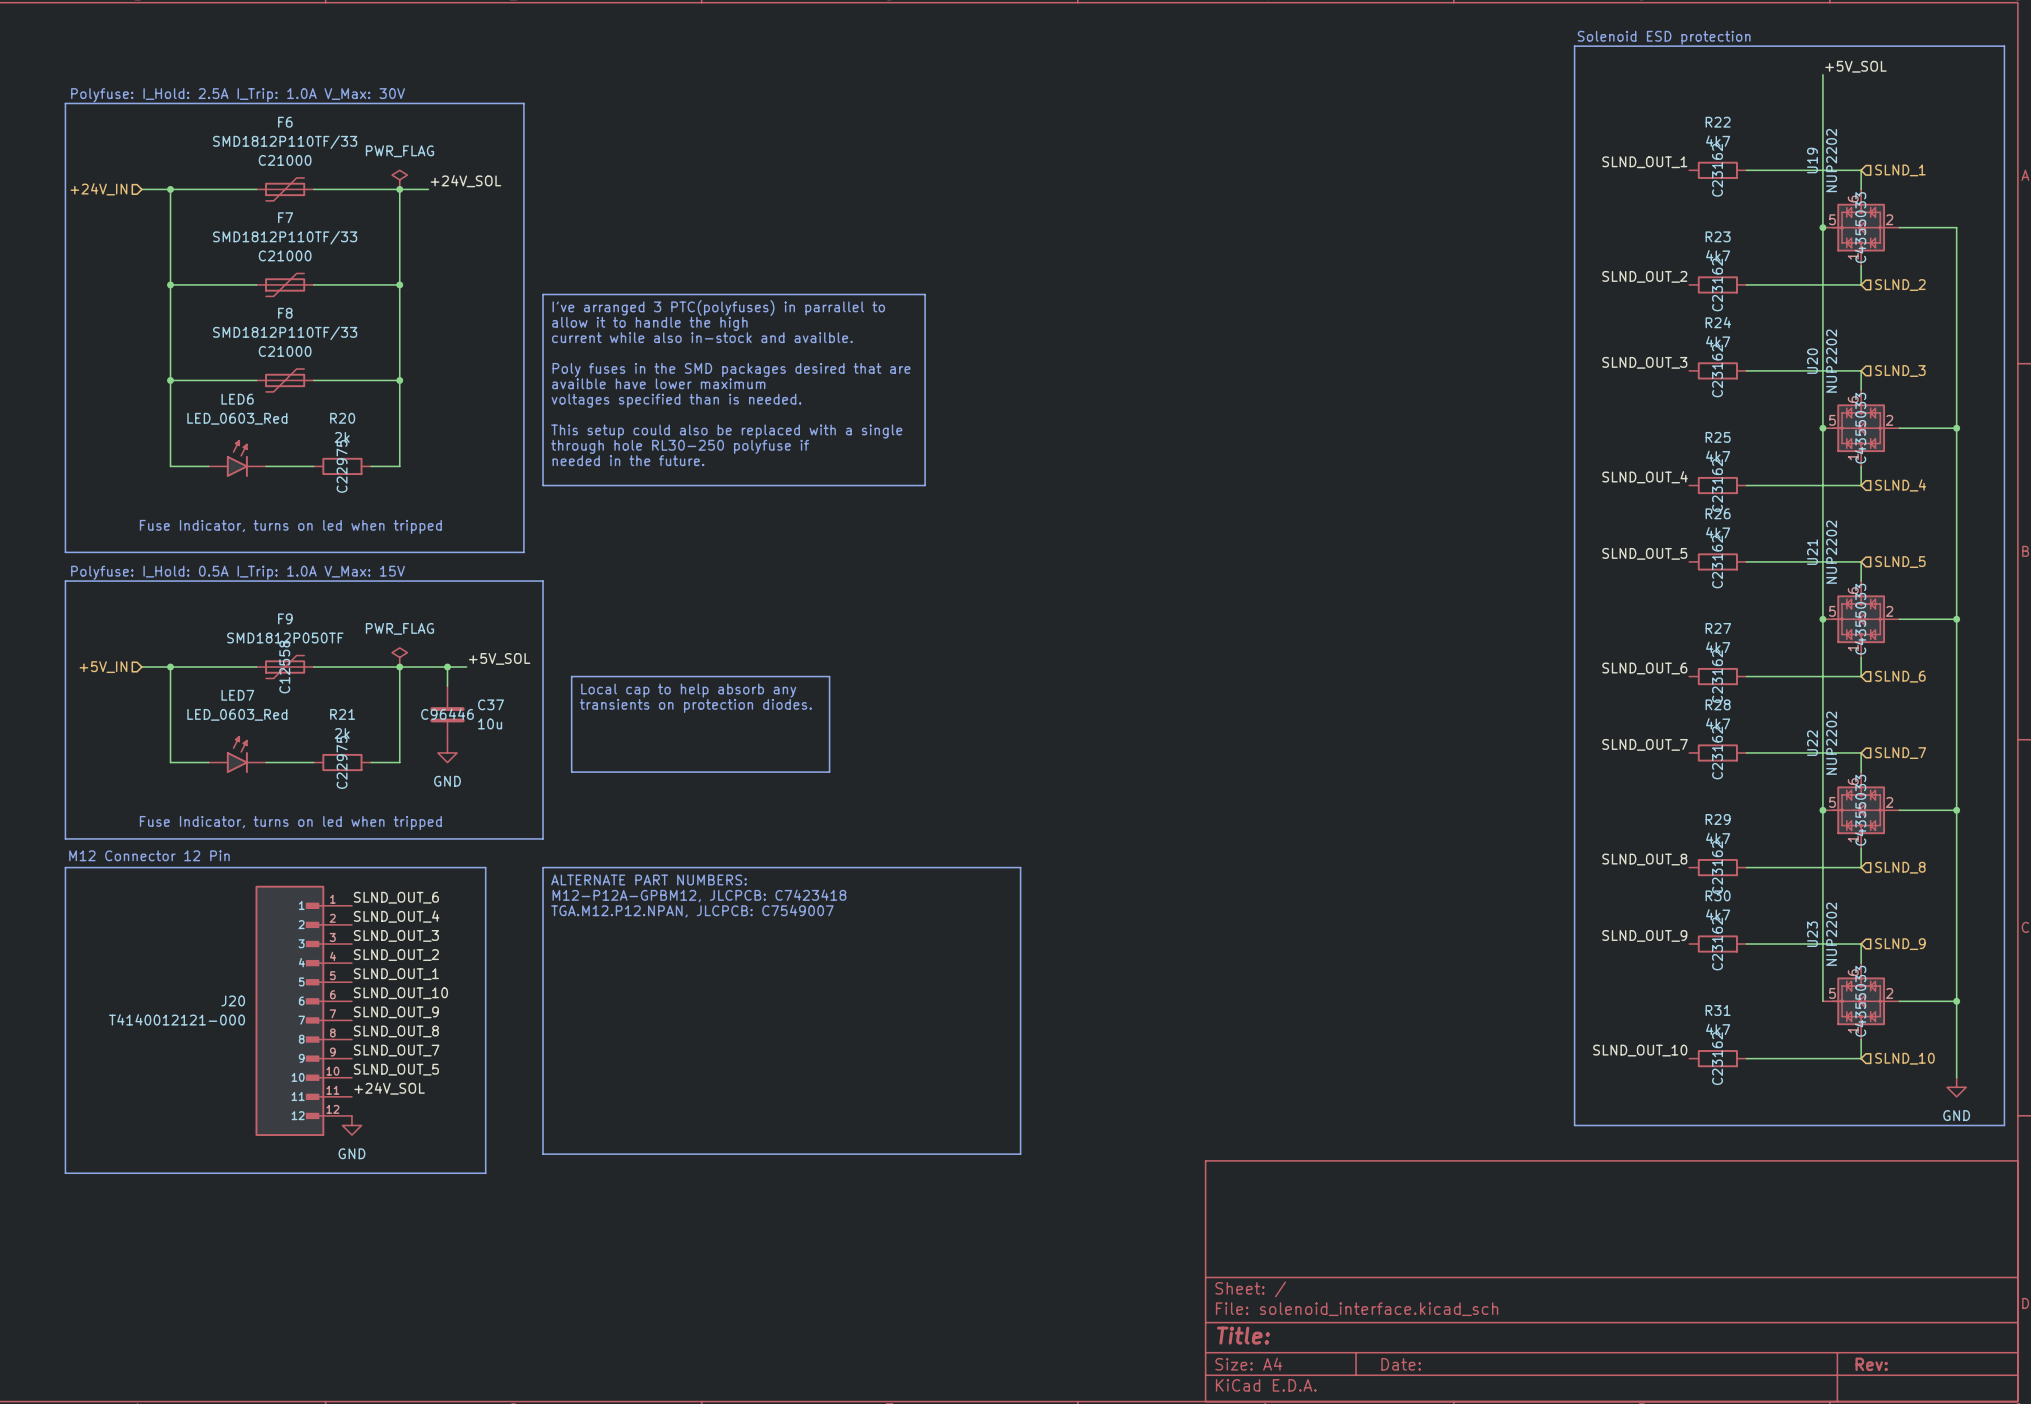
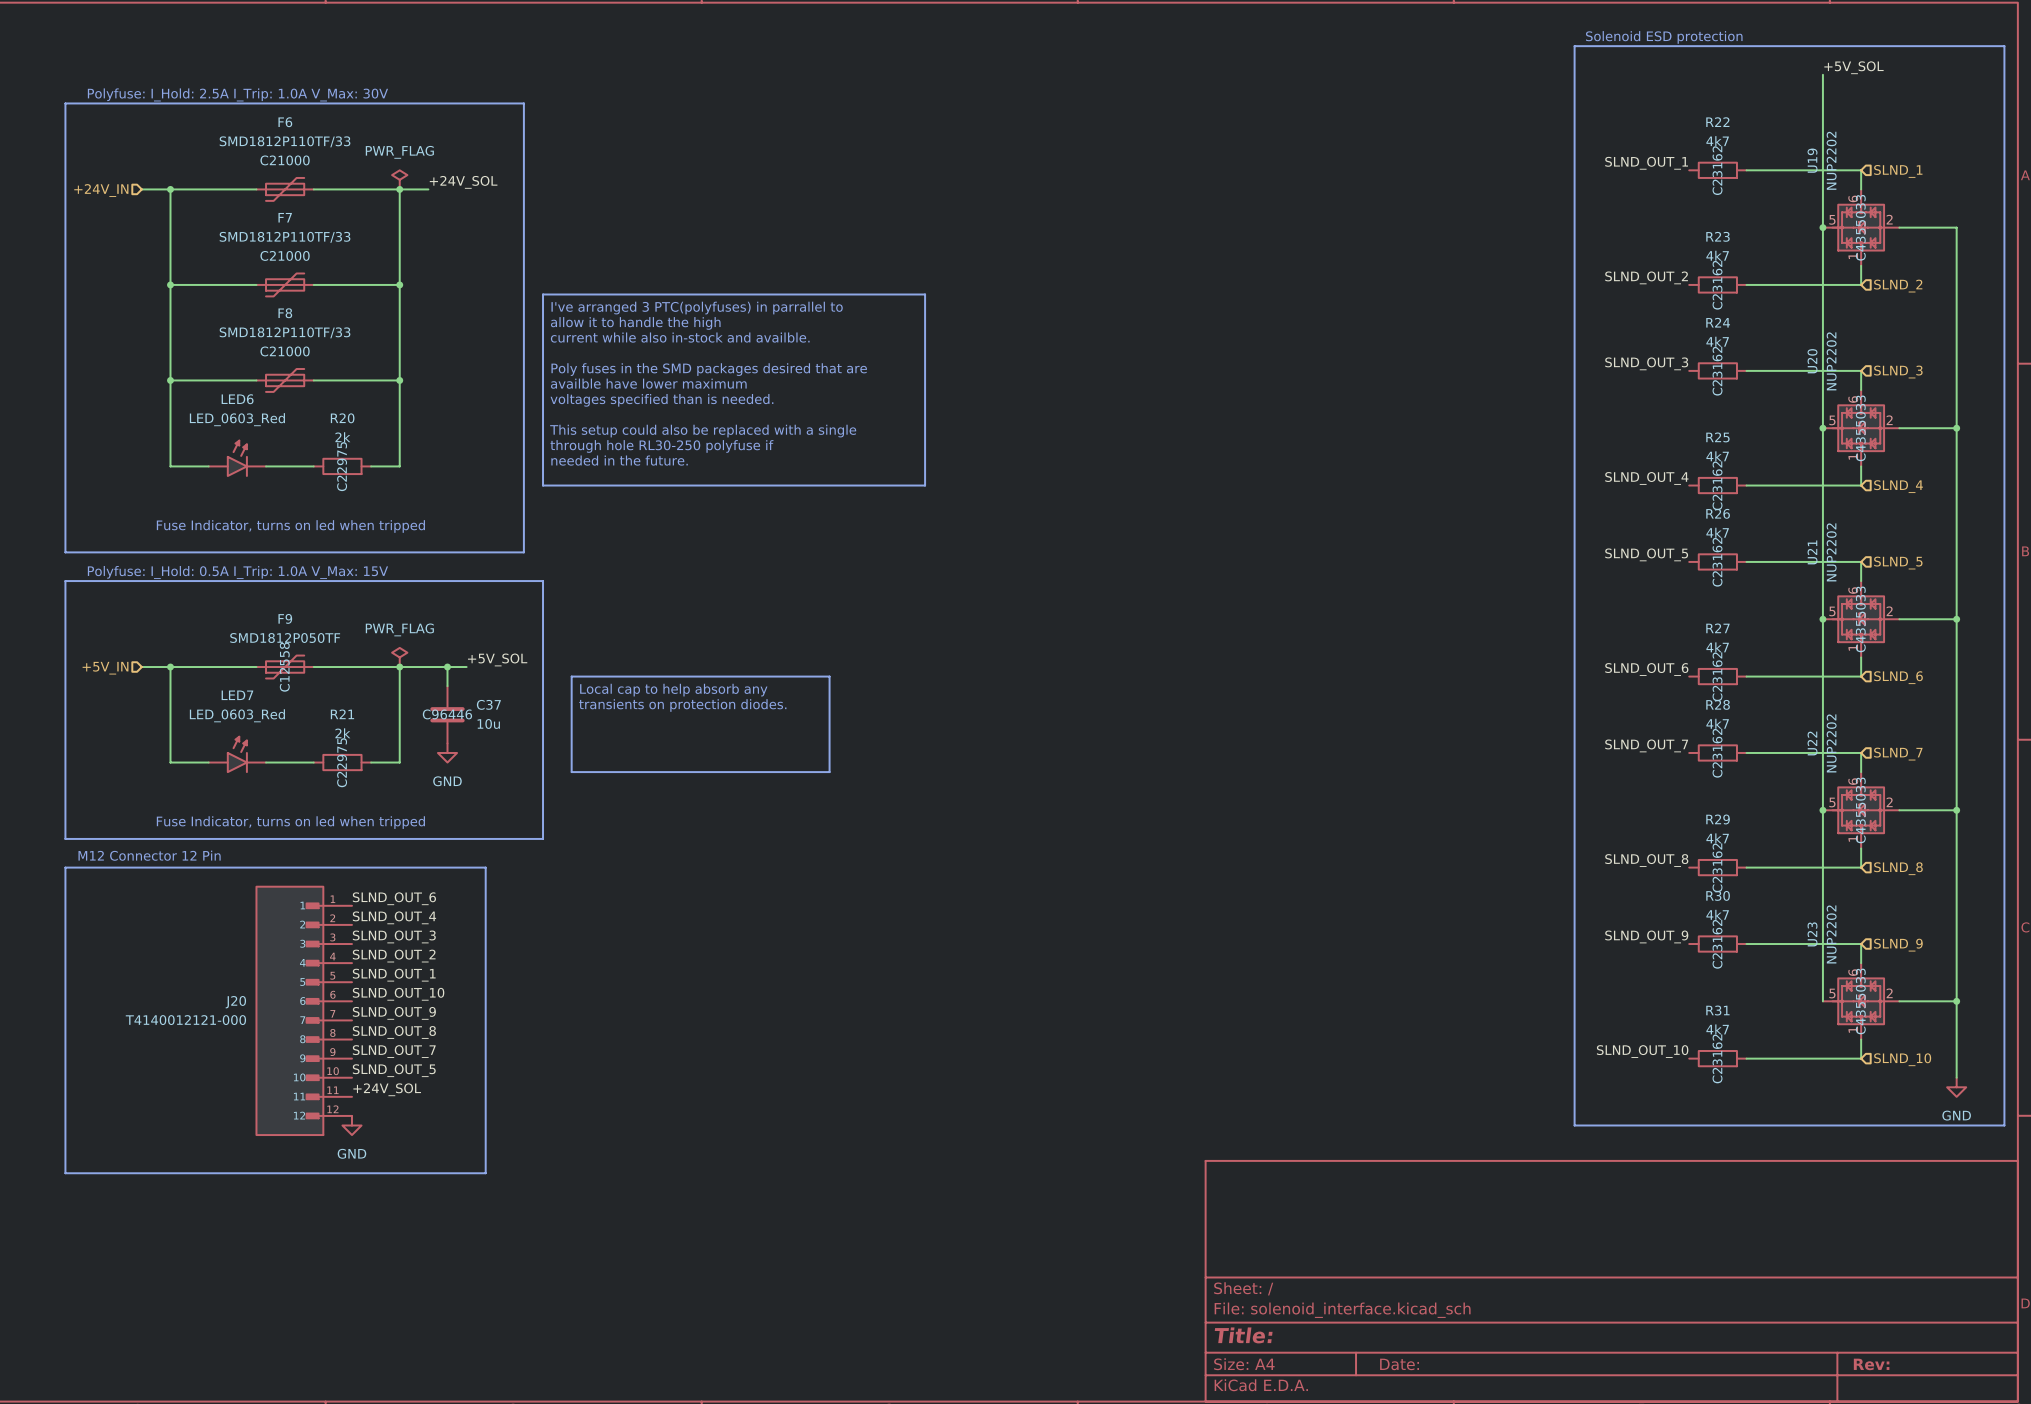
line: (543, 867) (1020, 867) (1020, 1154) (543, 1154) (543, 867) -> none
text: ALTERNATE PART NUMBERS: (648, 879) -> none
text: M12-P12A-GPBM12, JLCPCB: C7423418 (699, 895) -> none
text: TGA.M12.P12.NPAN, JLCPCB: C7549007 (692, 911) -> none

